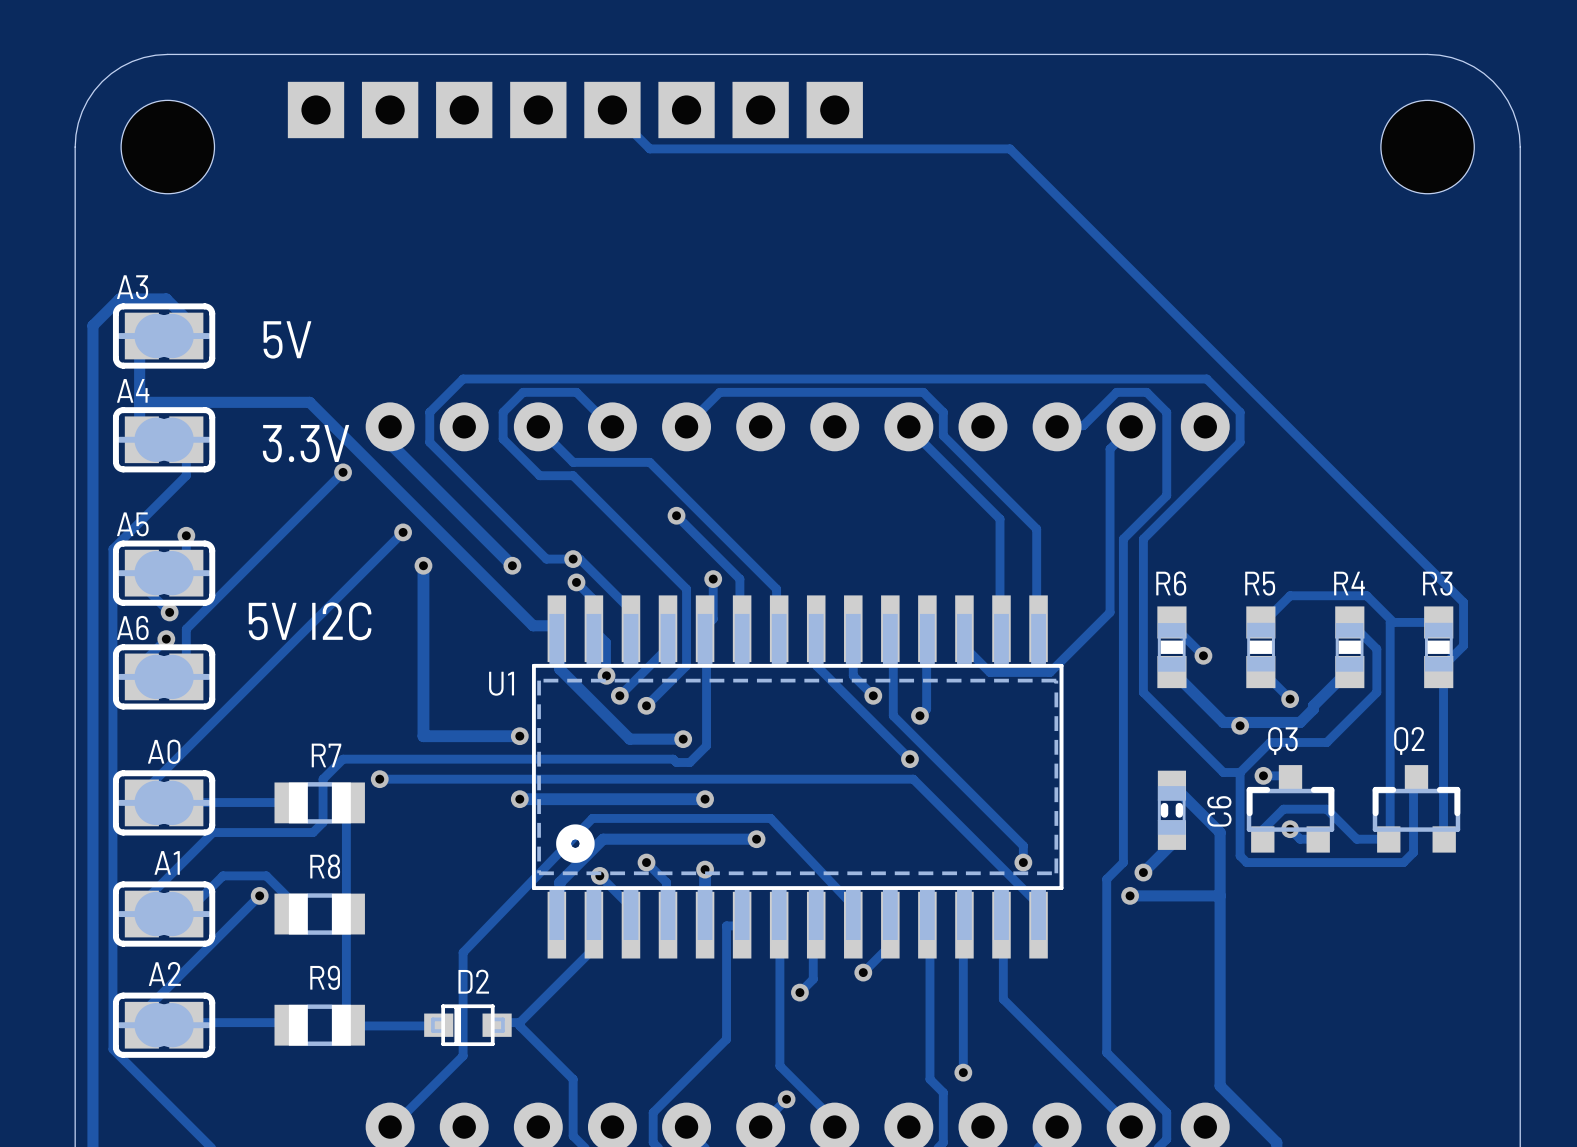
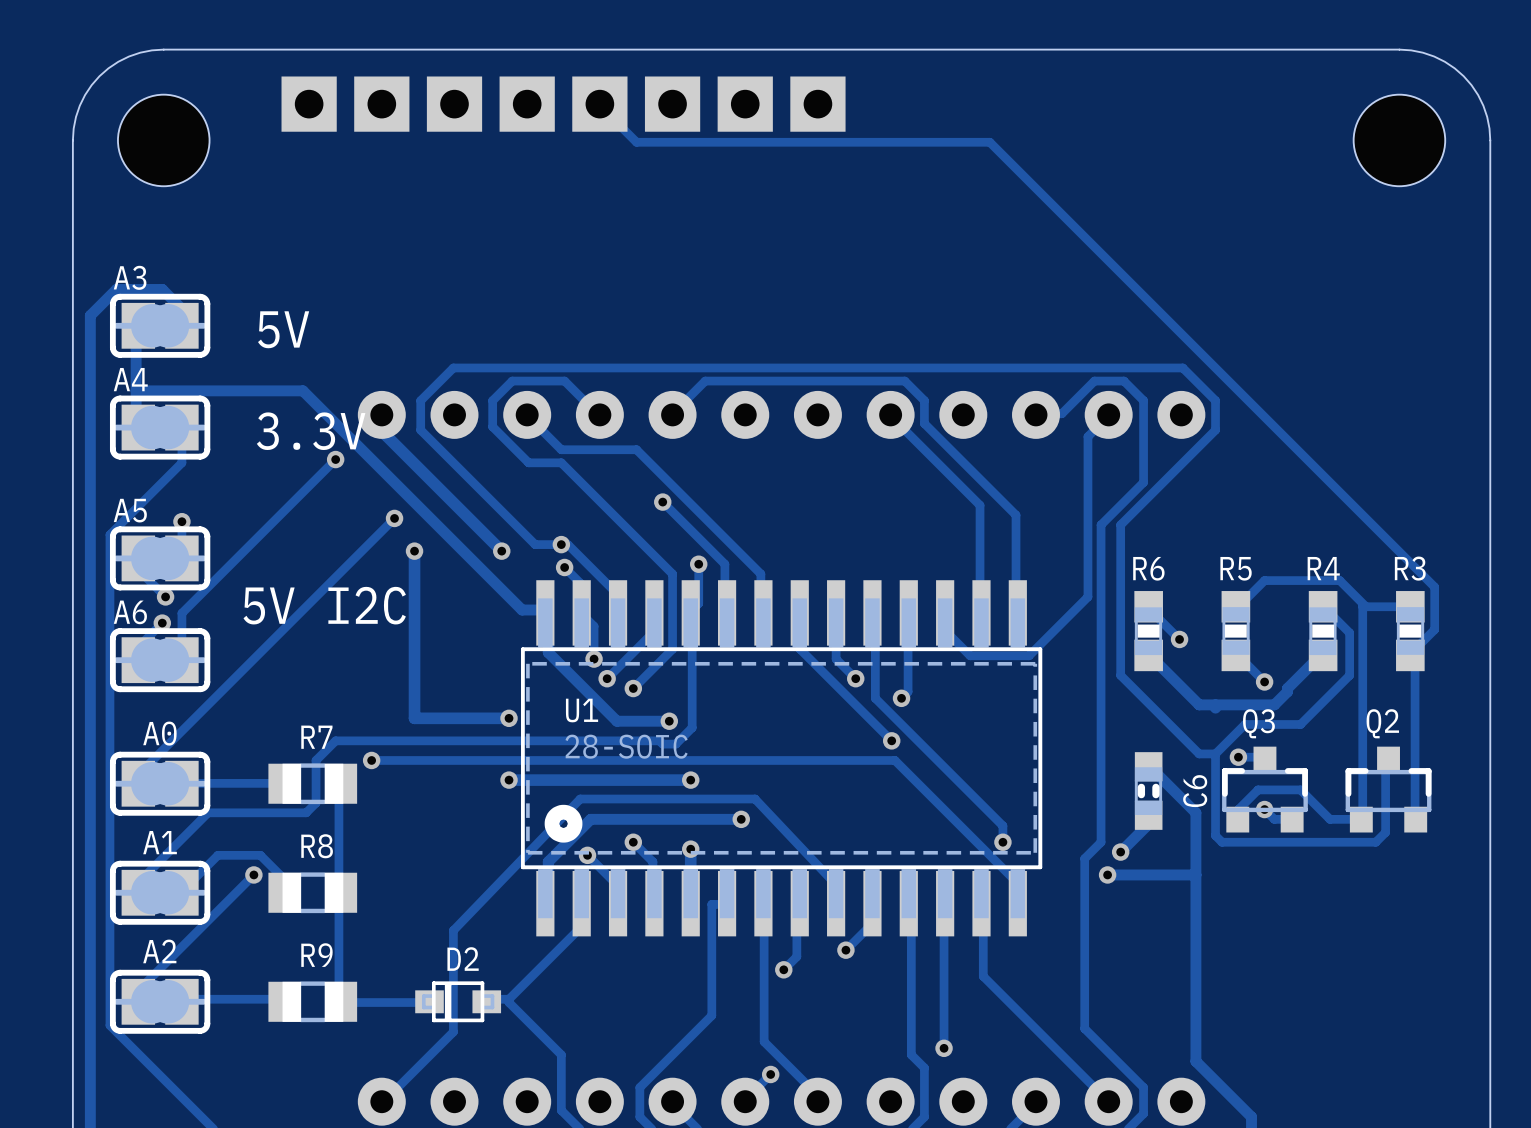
U1 name position: U1 (501, 683) -> U1 (582, 710)
via: (1240, 725) -> none
U1 value: none -> 28-SOIC (626, 746)

